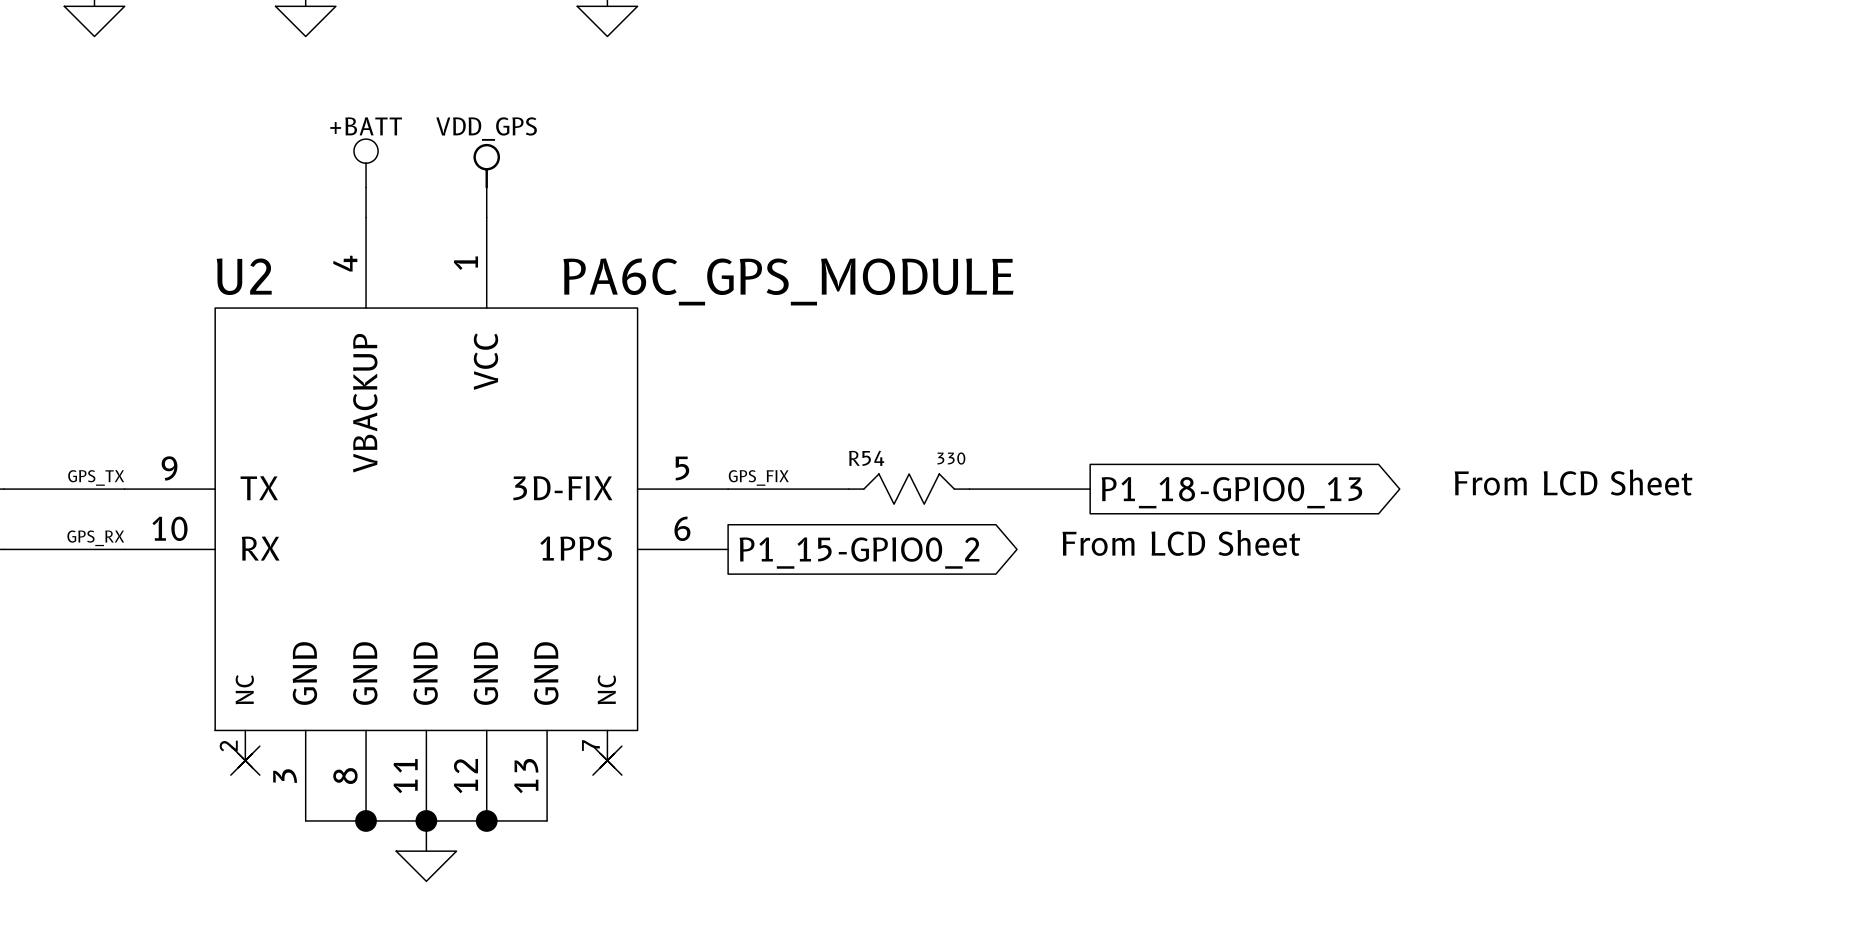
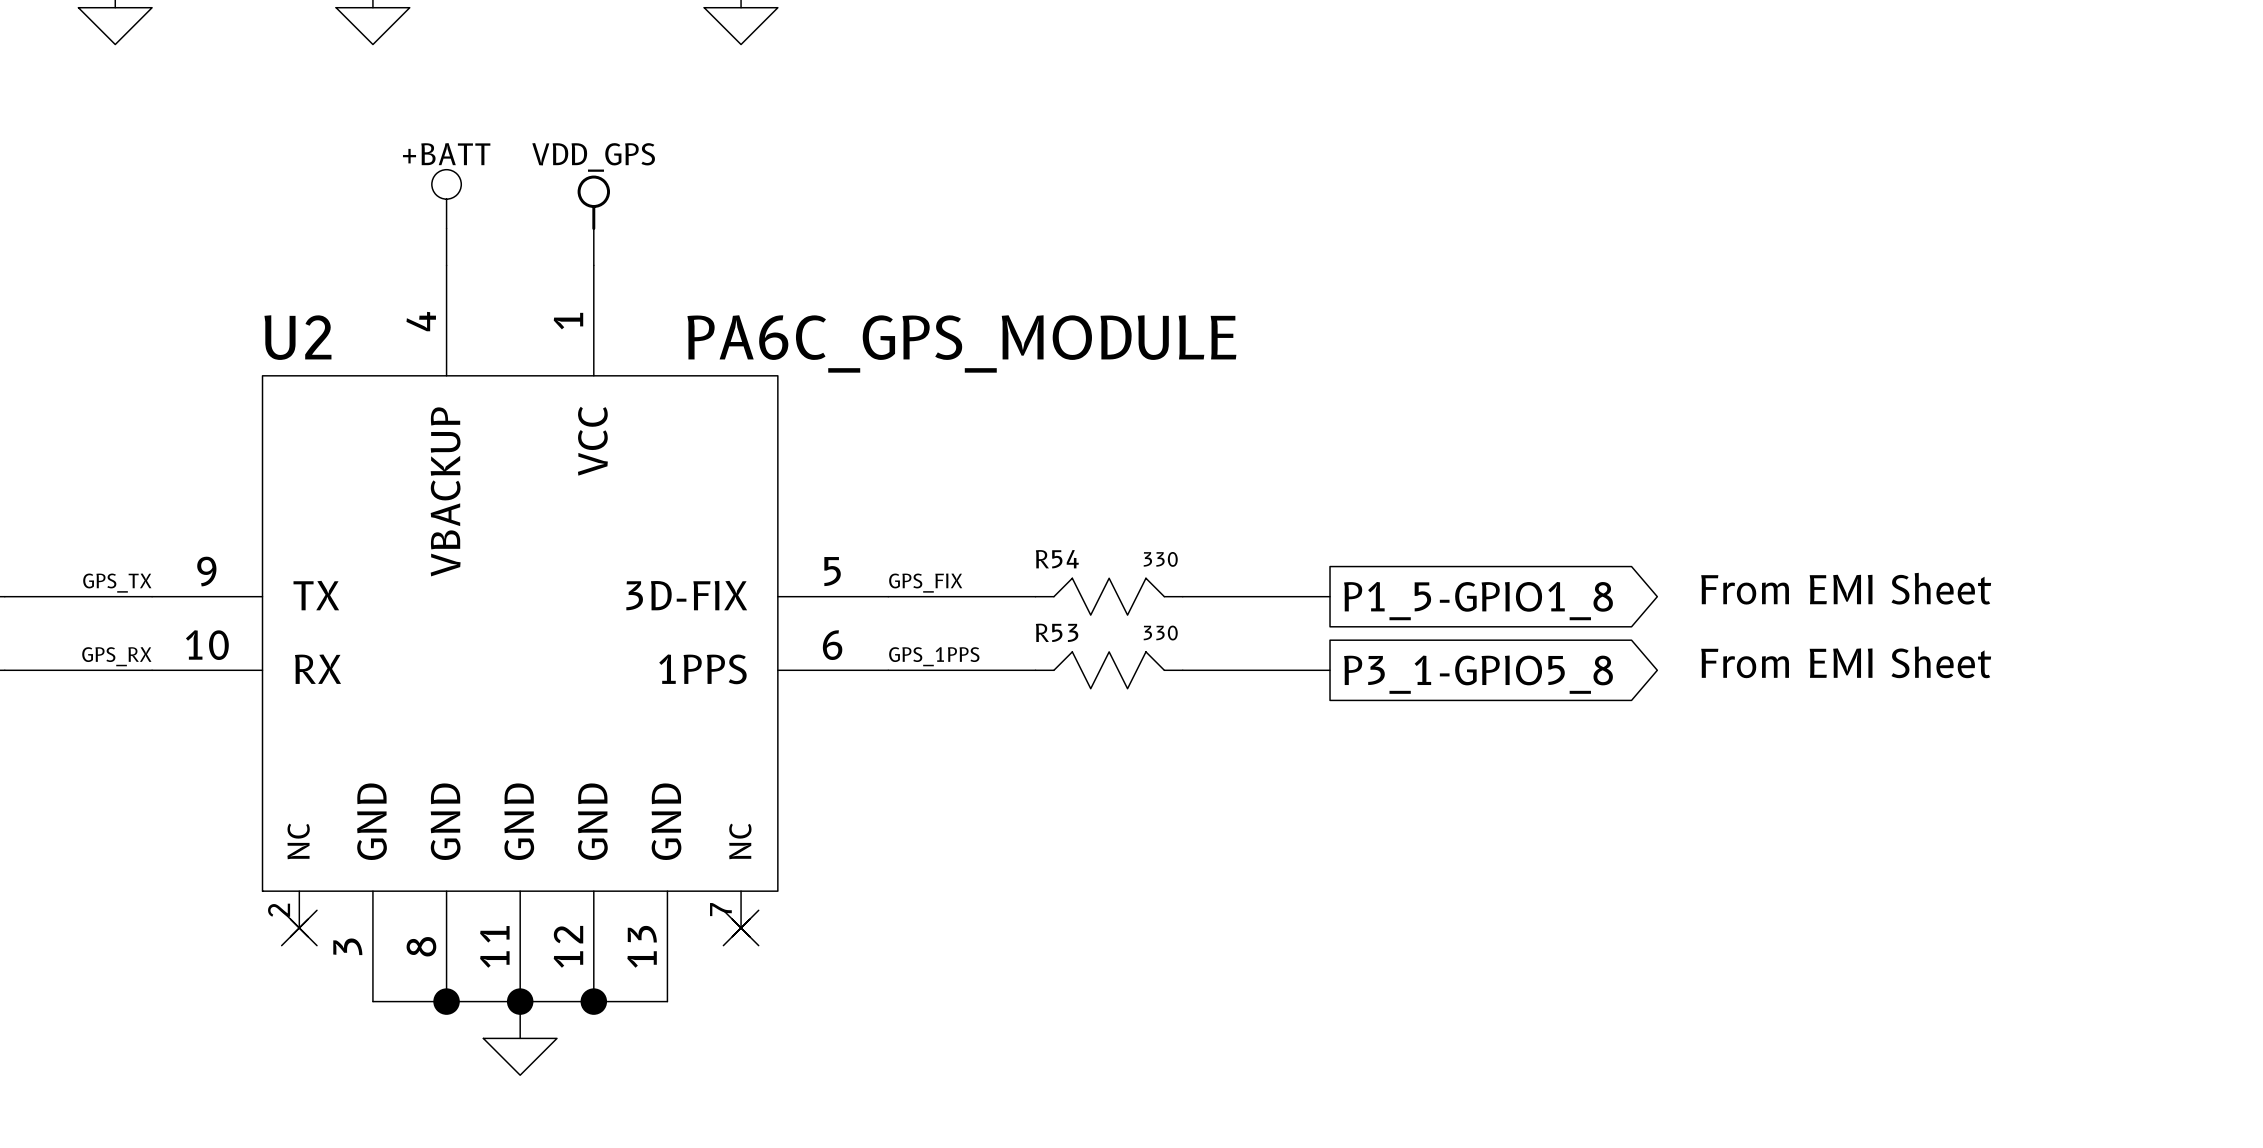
text: From LCD Sheet (1573, 482) -> From EMI Sheet (1846, 588)
global label: P1_18-GPIO0_13 (1231, 492) -> P1_5-GPIO1_8 (1478, 601)
label: none -> GPS_1PPS (934, 656)
text: From LCD Sheet (1181, 542) -> From EMI Sheet (1846, 662)
wire: none -> (888, 670) (1035, 670)
R53: none -> 330 (1109, 670)
wire: none -> (1182, 670) (1330, 670)
global label: P1_15-GPIO0_2 (859, 553) -> P3_1-GPIO5_8 (1478, 674)

